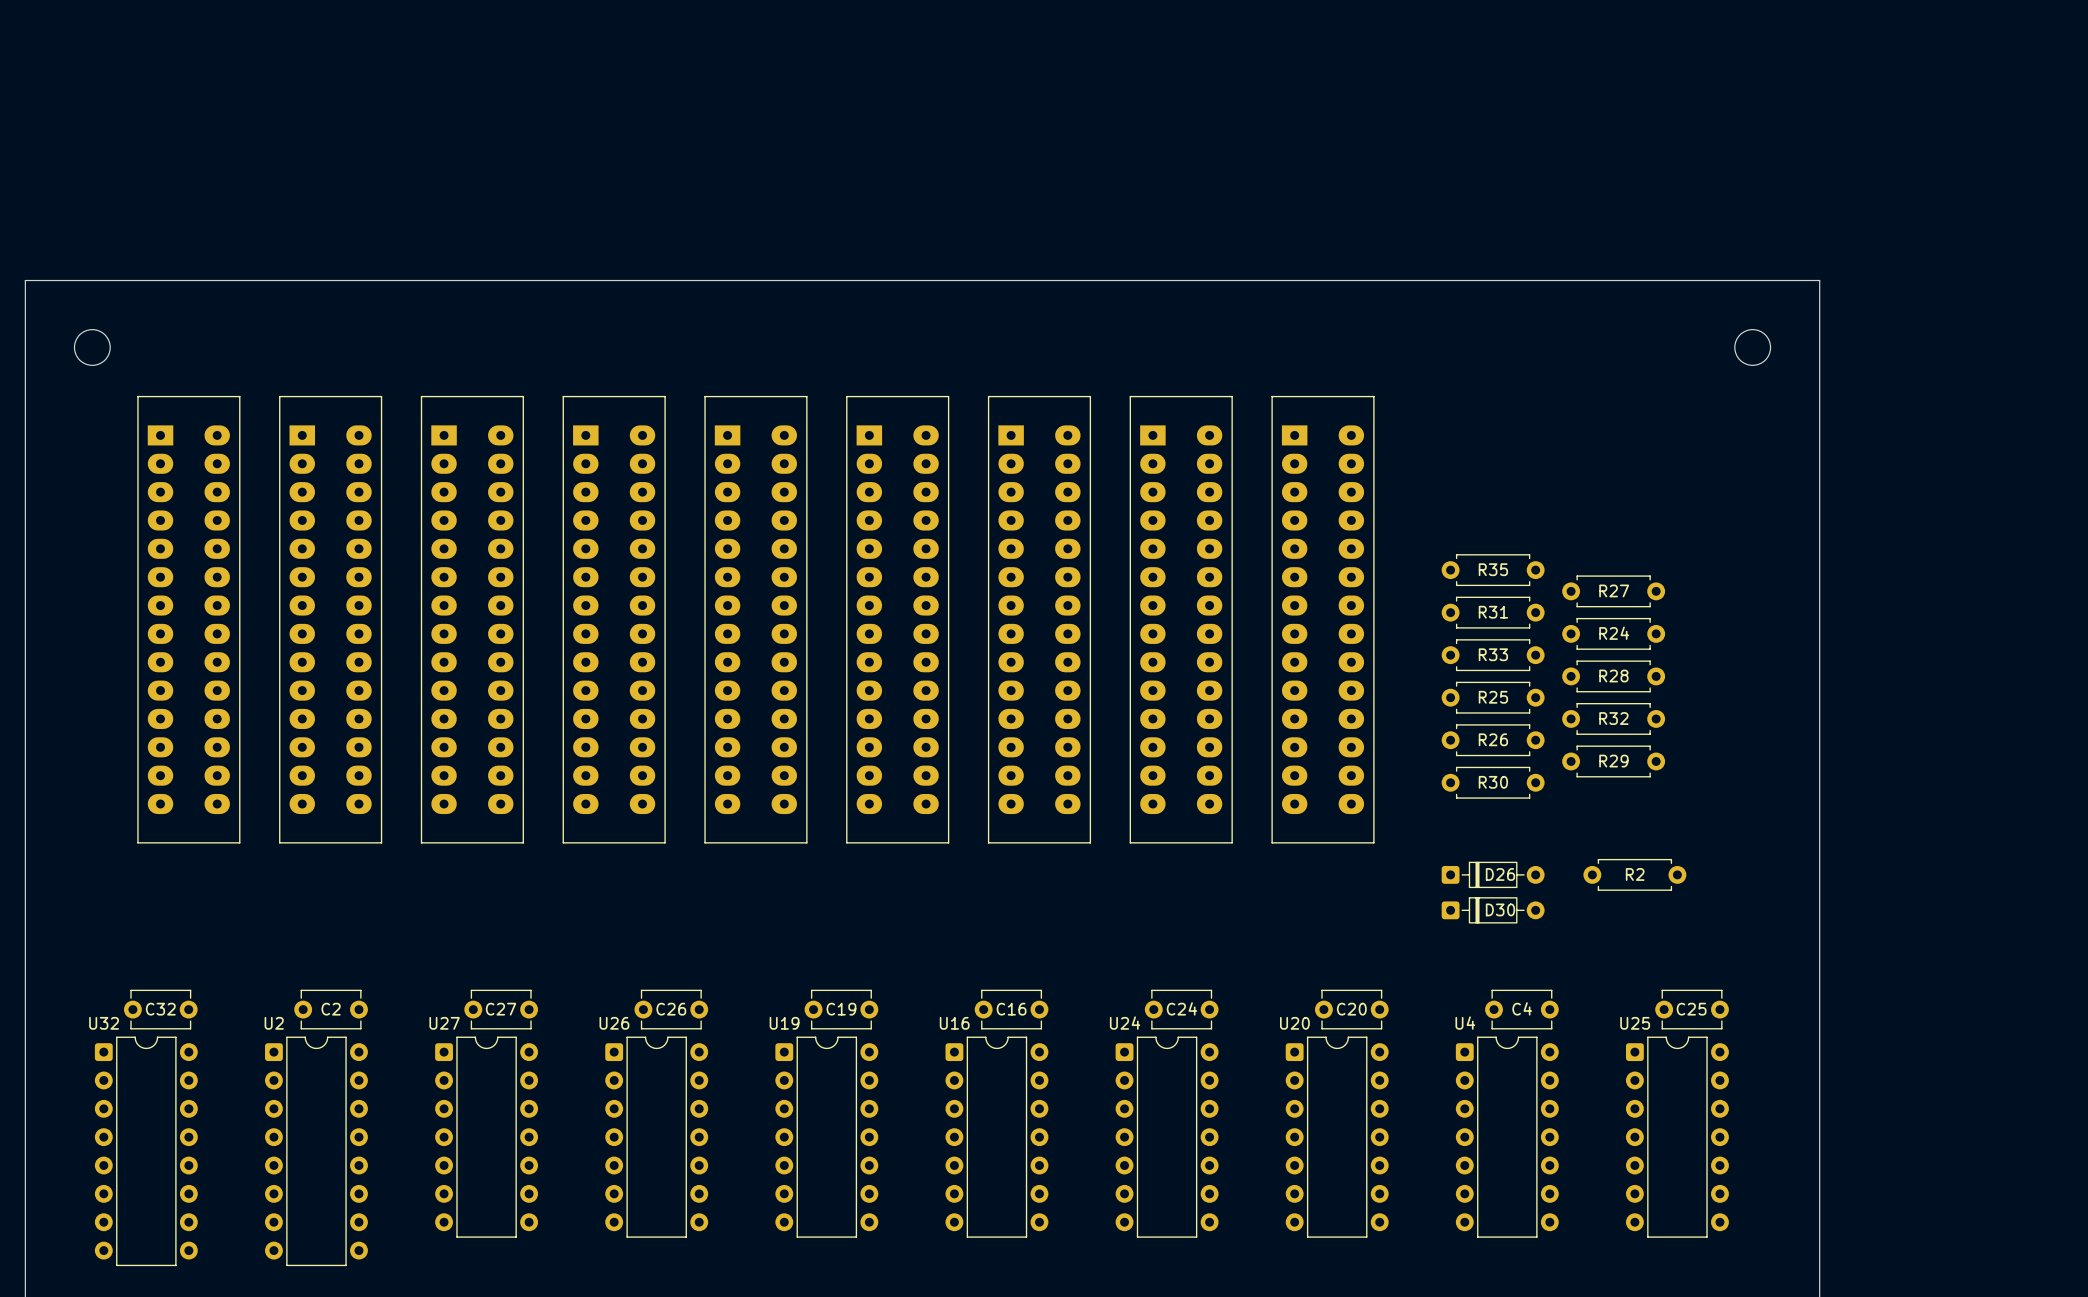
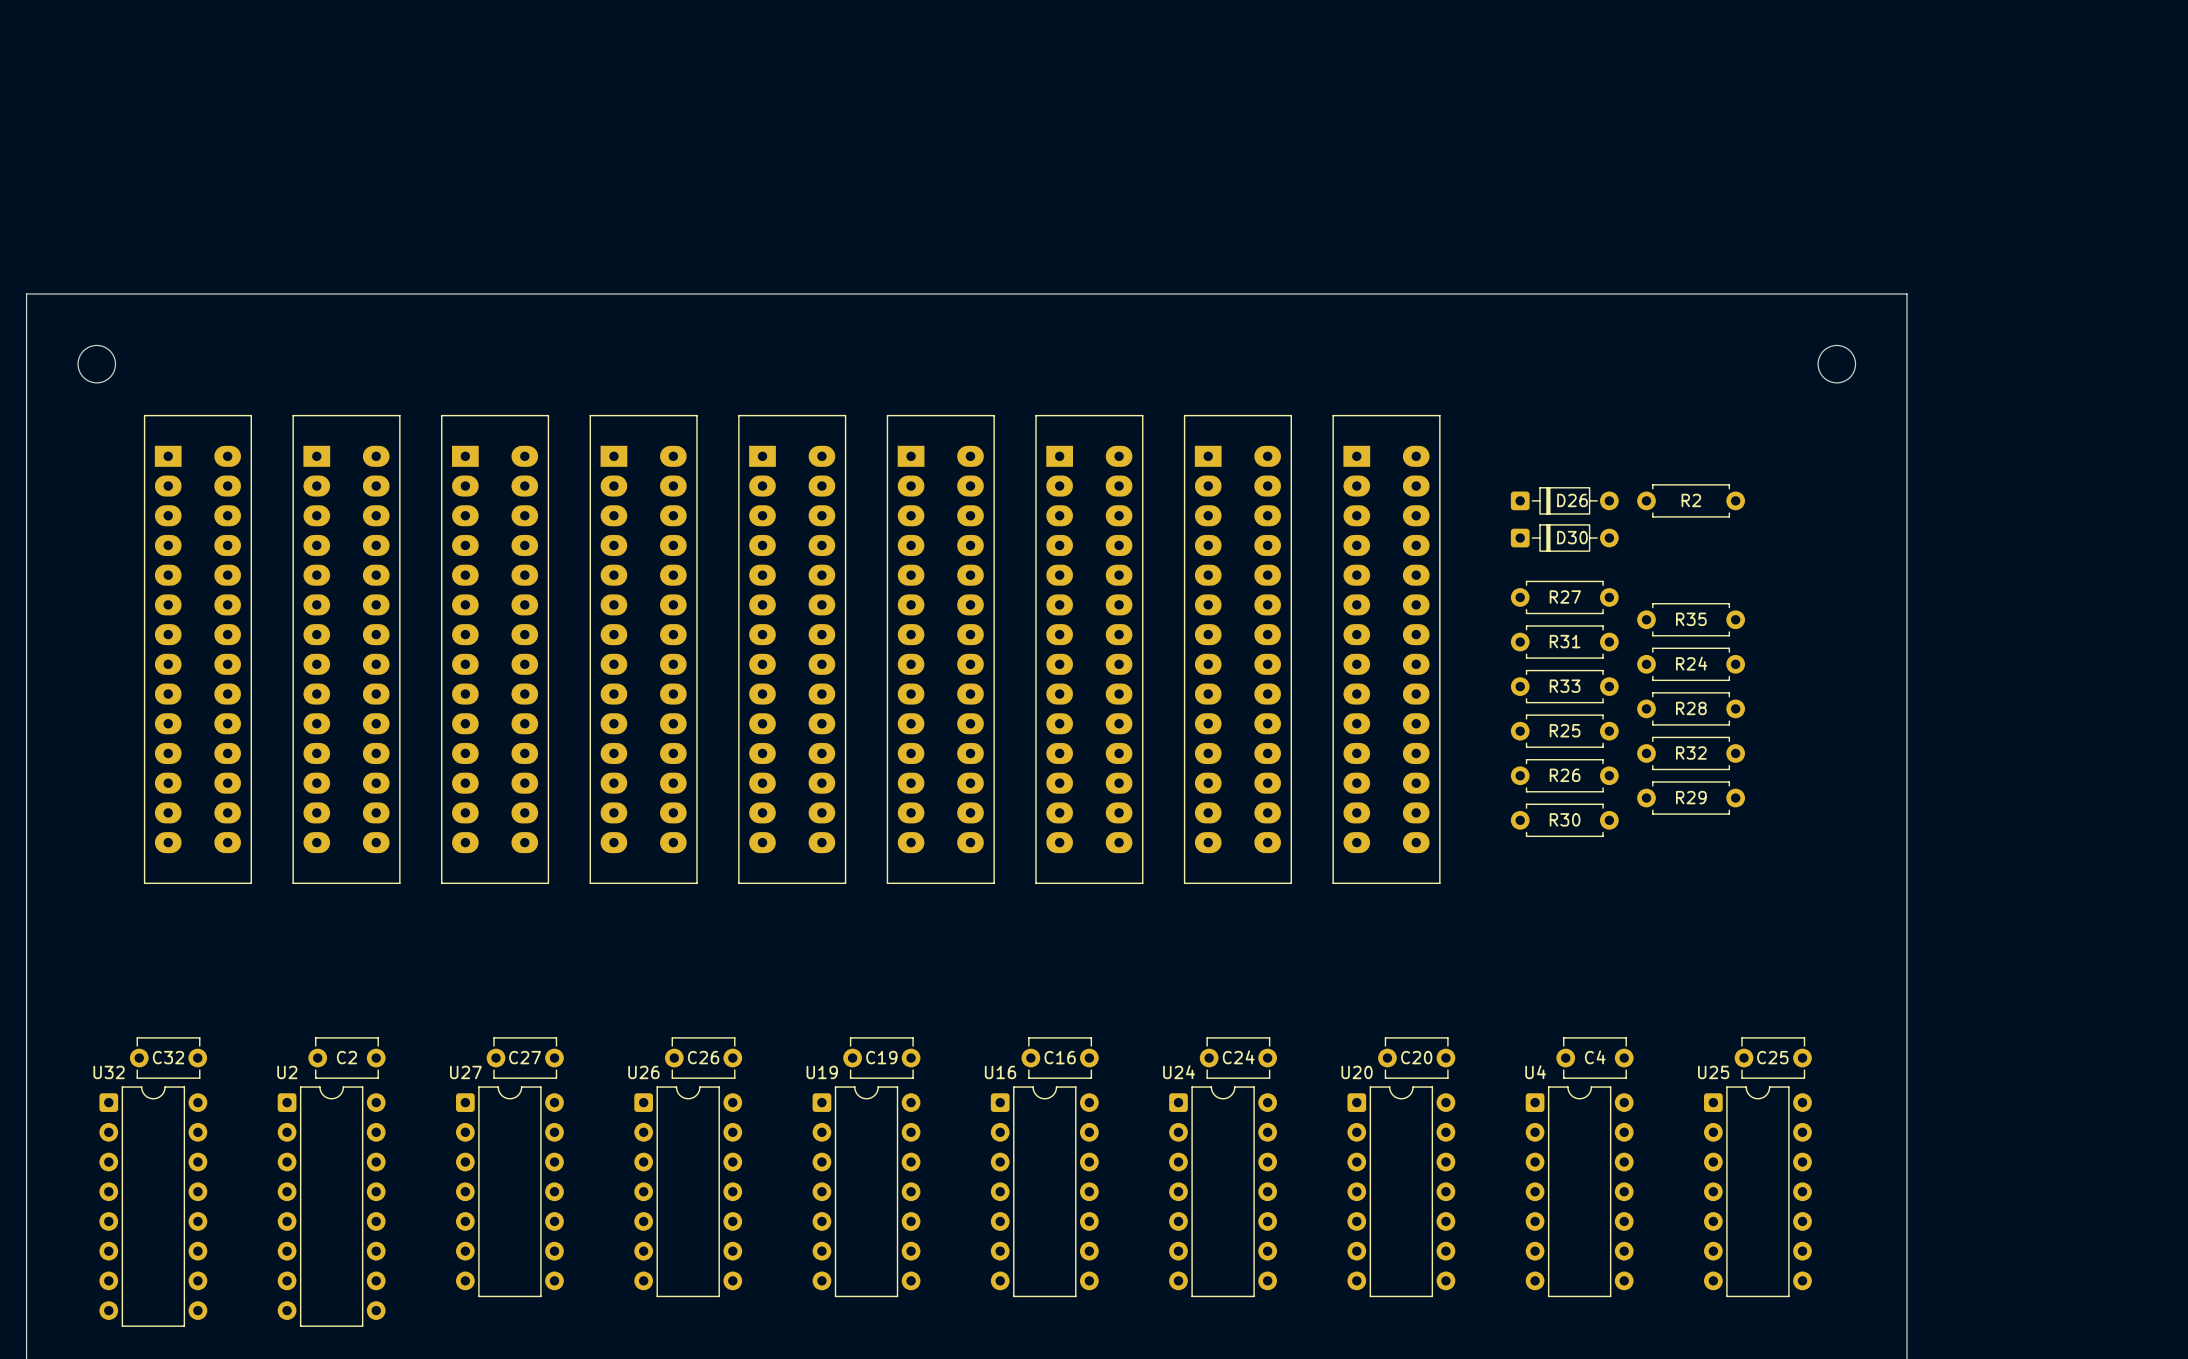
R35 name: R35 (1493, 569) -> R27 (1565, 597)
R27 name: R27 (1614, 590) -> R35 (1691, 619)
D26 position: (1493, 874) -> (1564, 500)
R2 position: (1634, 874) -> (1691, 500)
D30 position: (1493, 910) -> (1564, 538)

